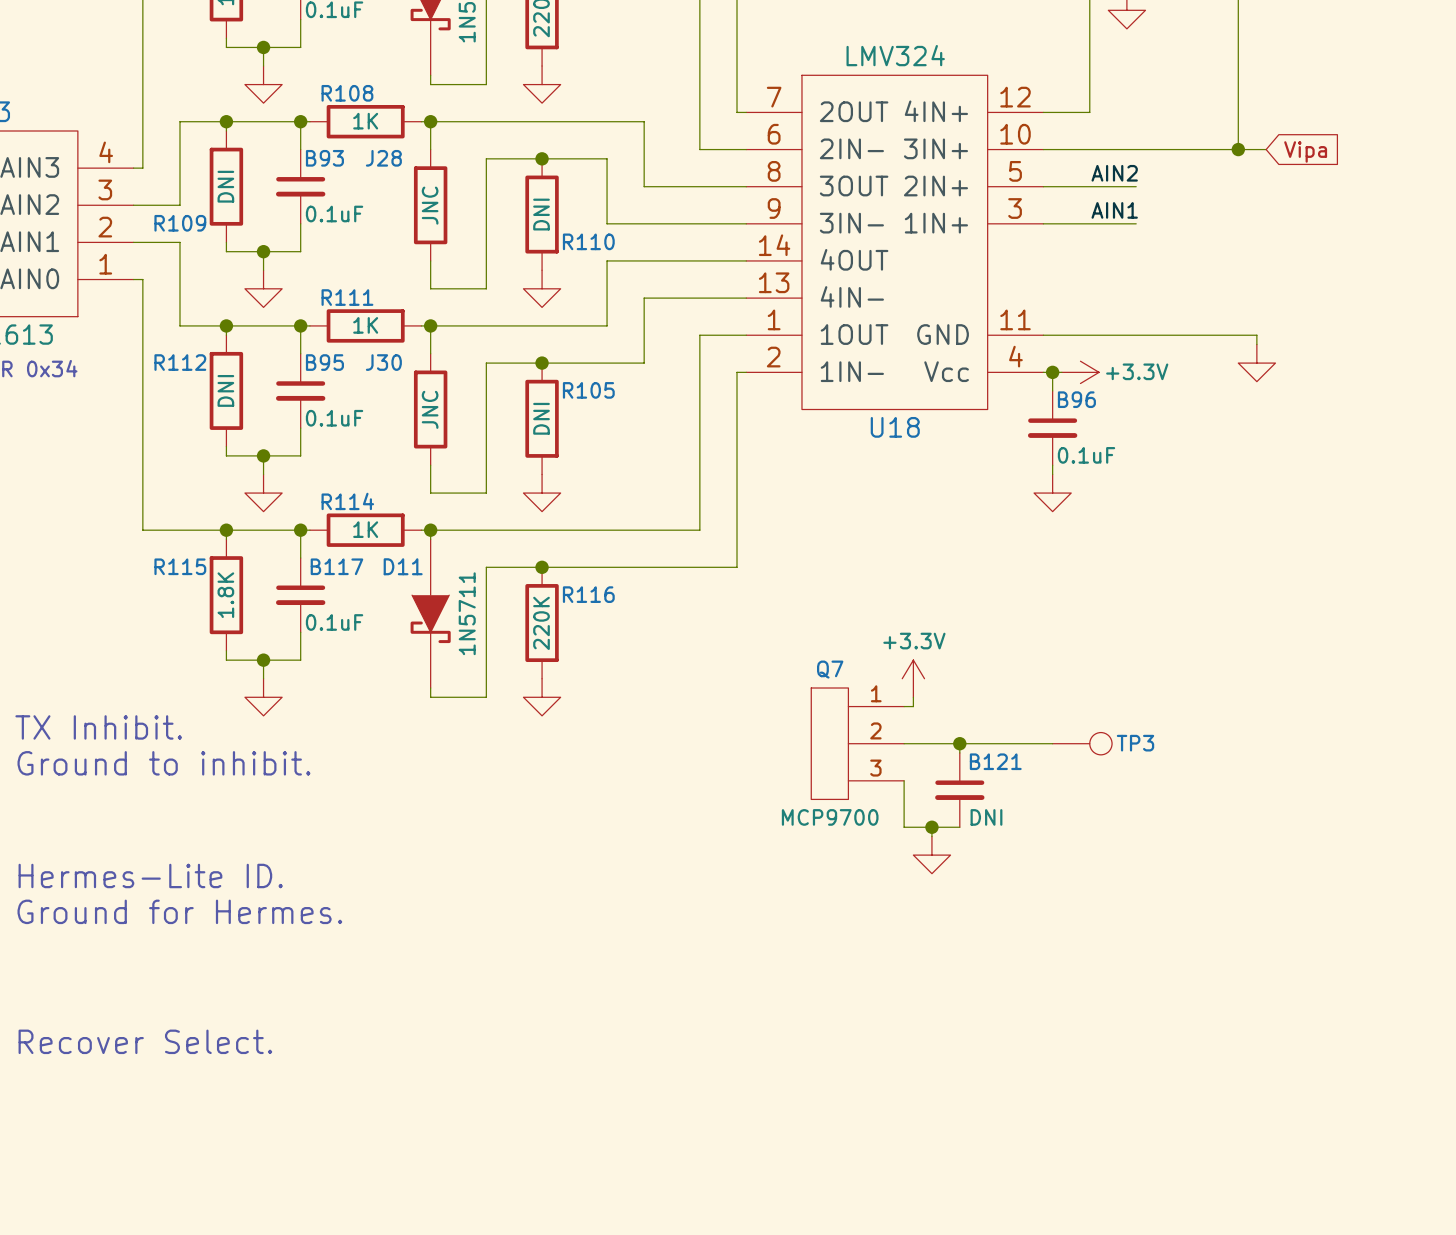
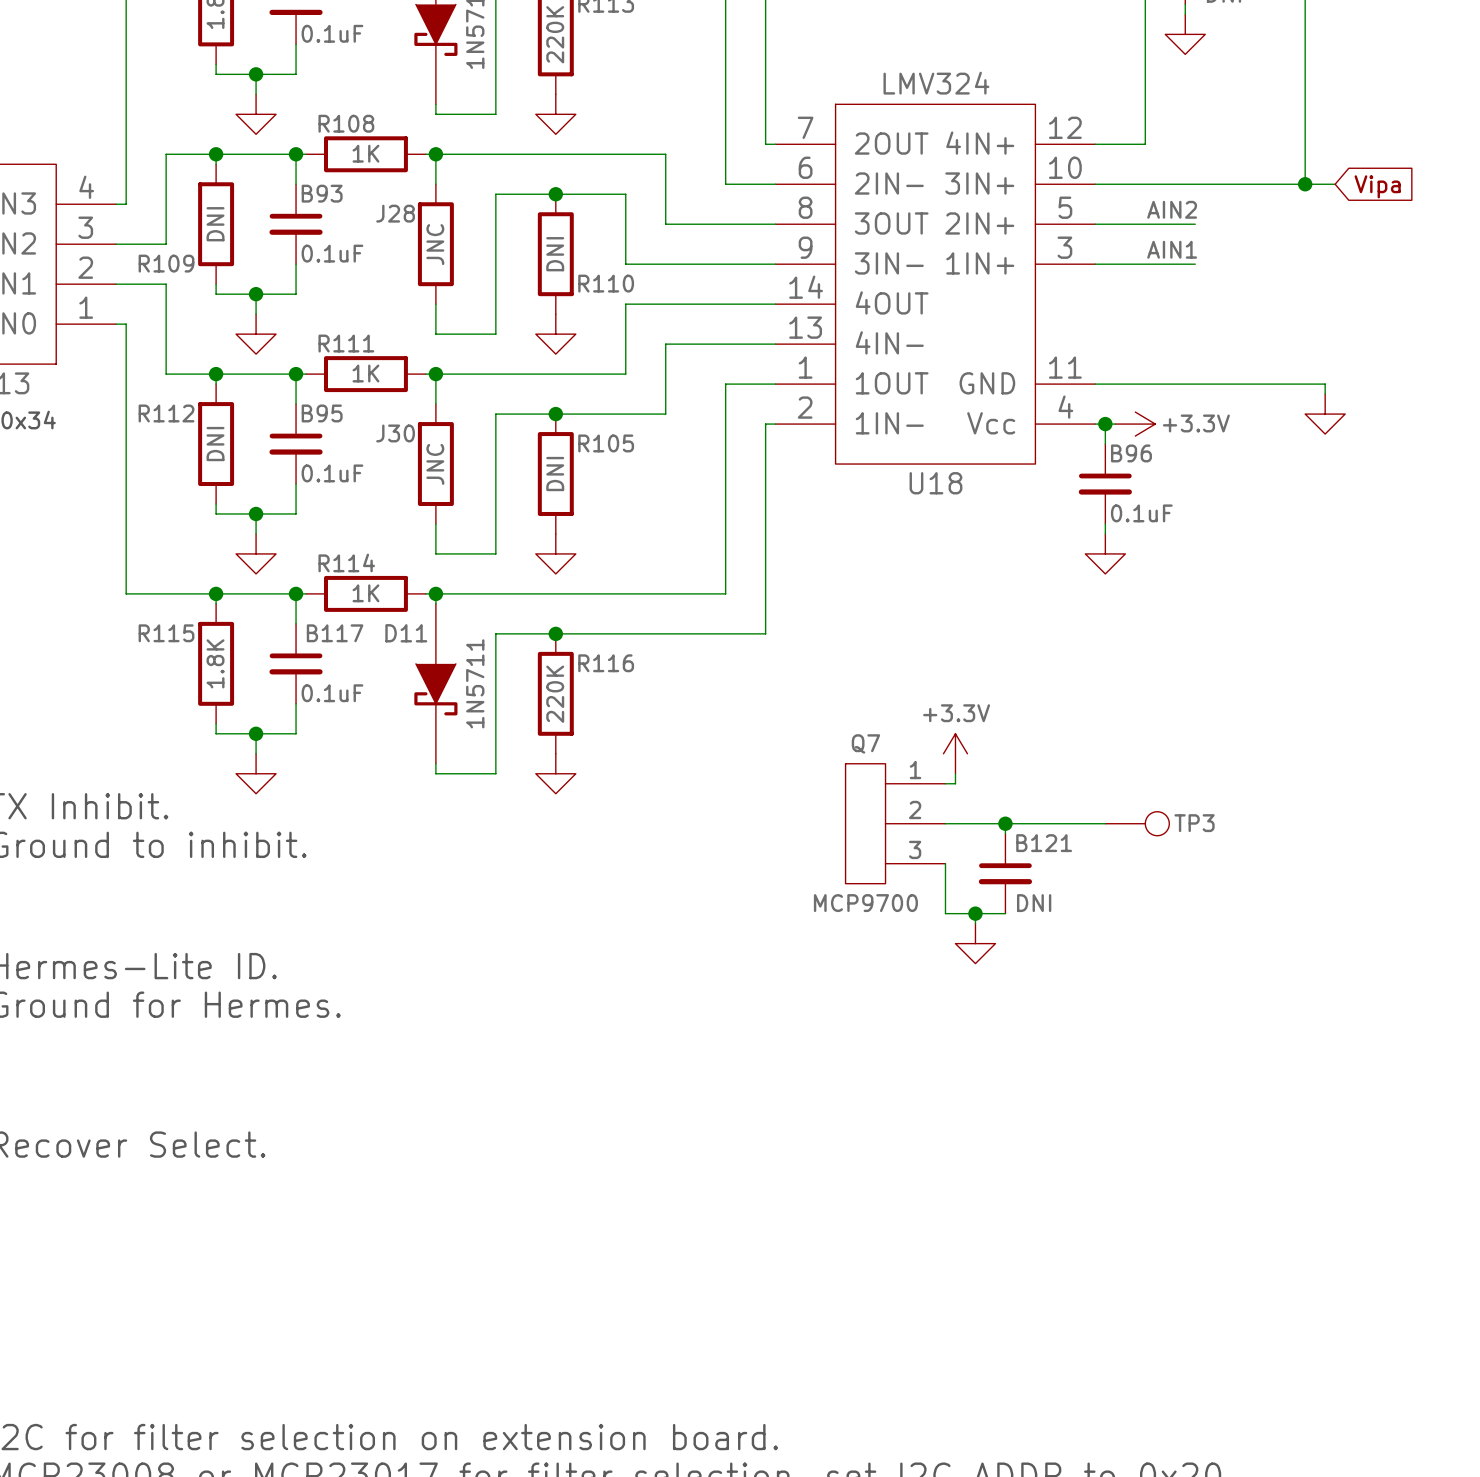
J28 name position: J28 (383, 158) -> J28 (395, 213)
J30 name position: J30 (383, 362) -> J30 (395, 433)

